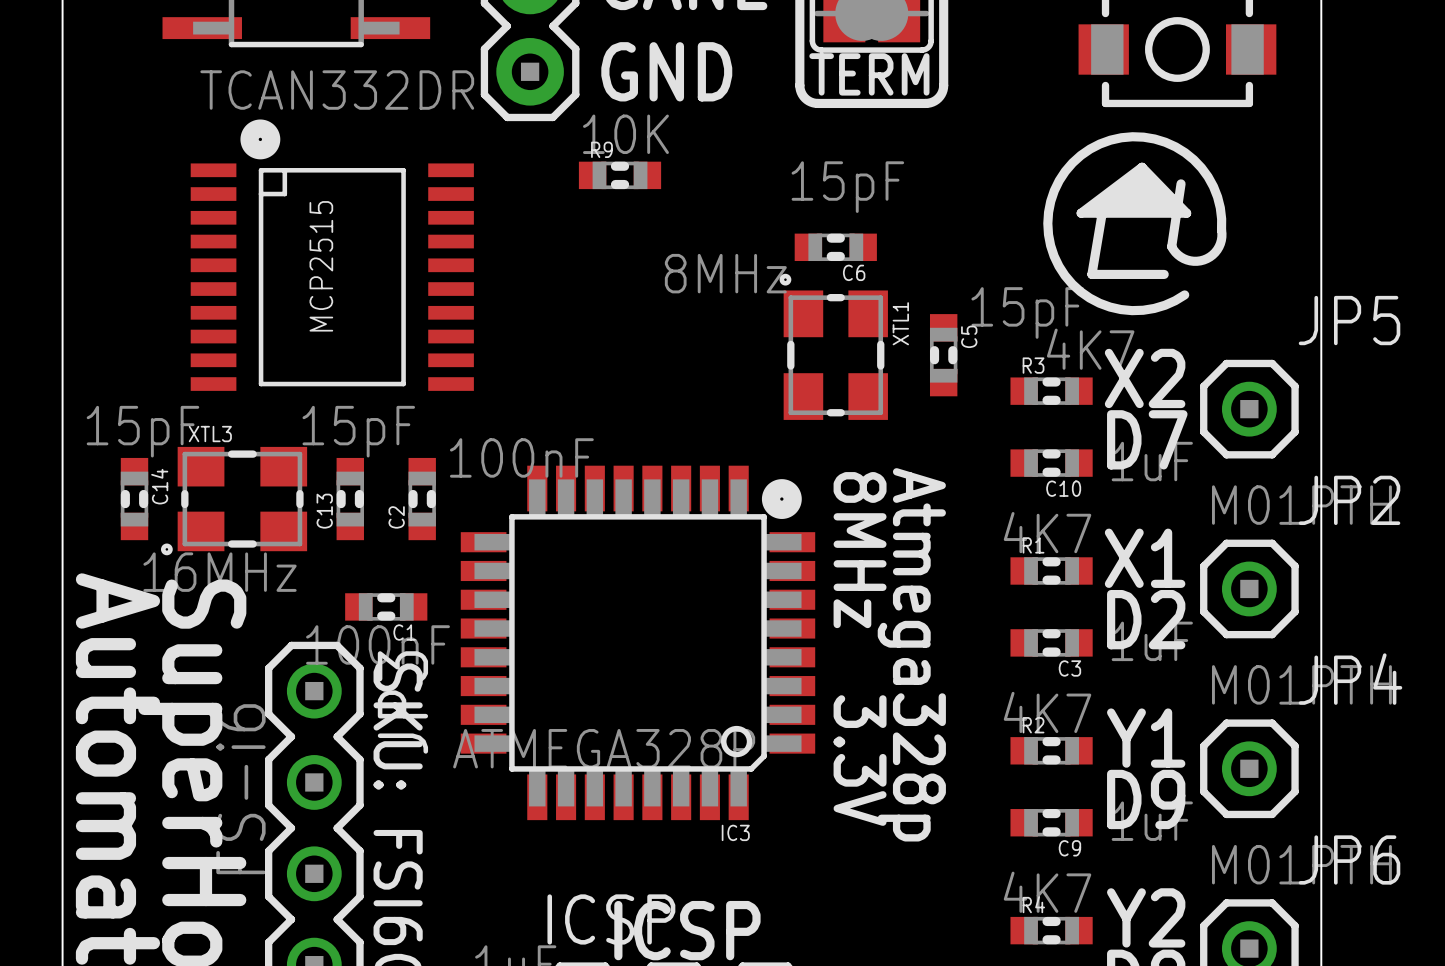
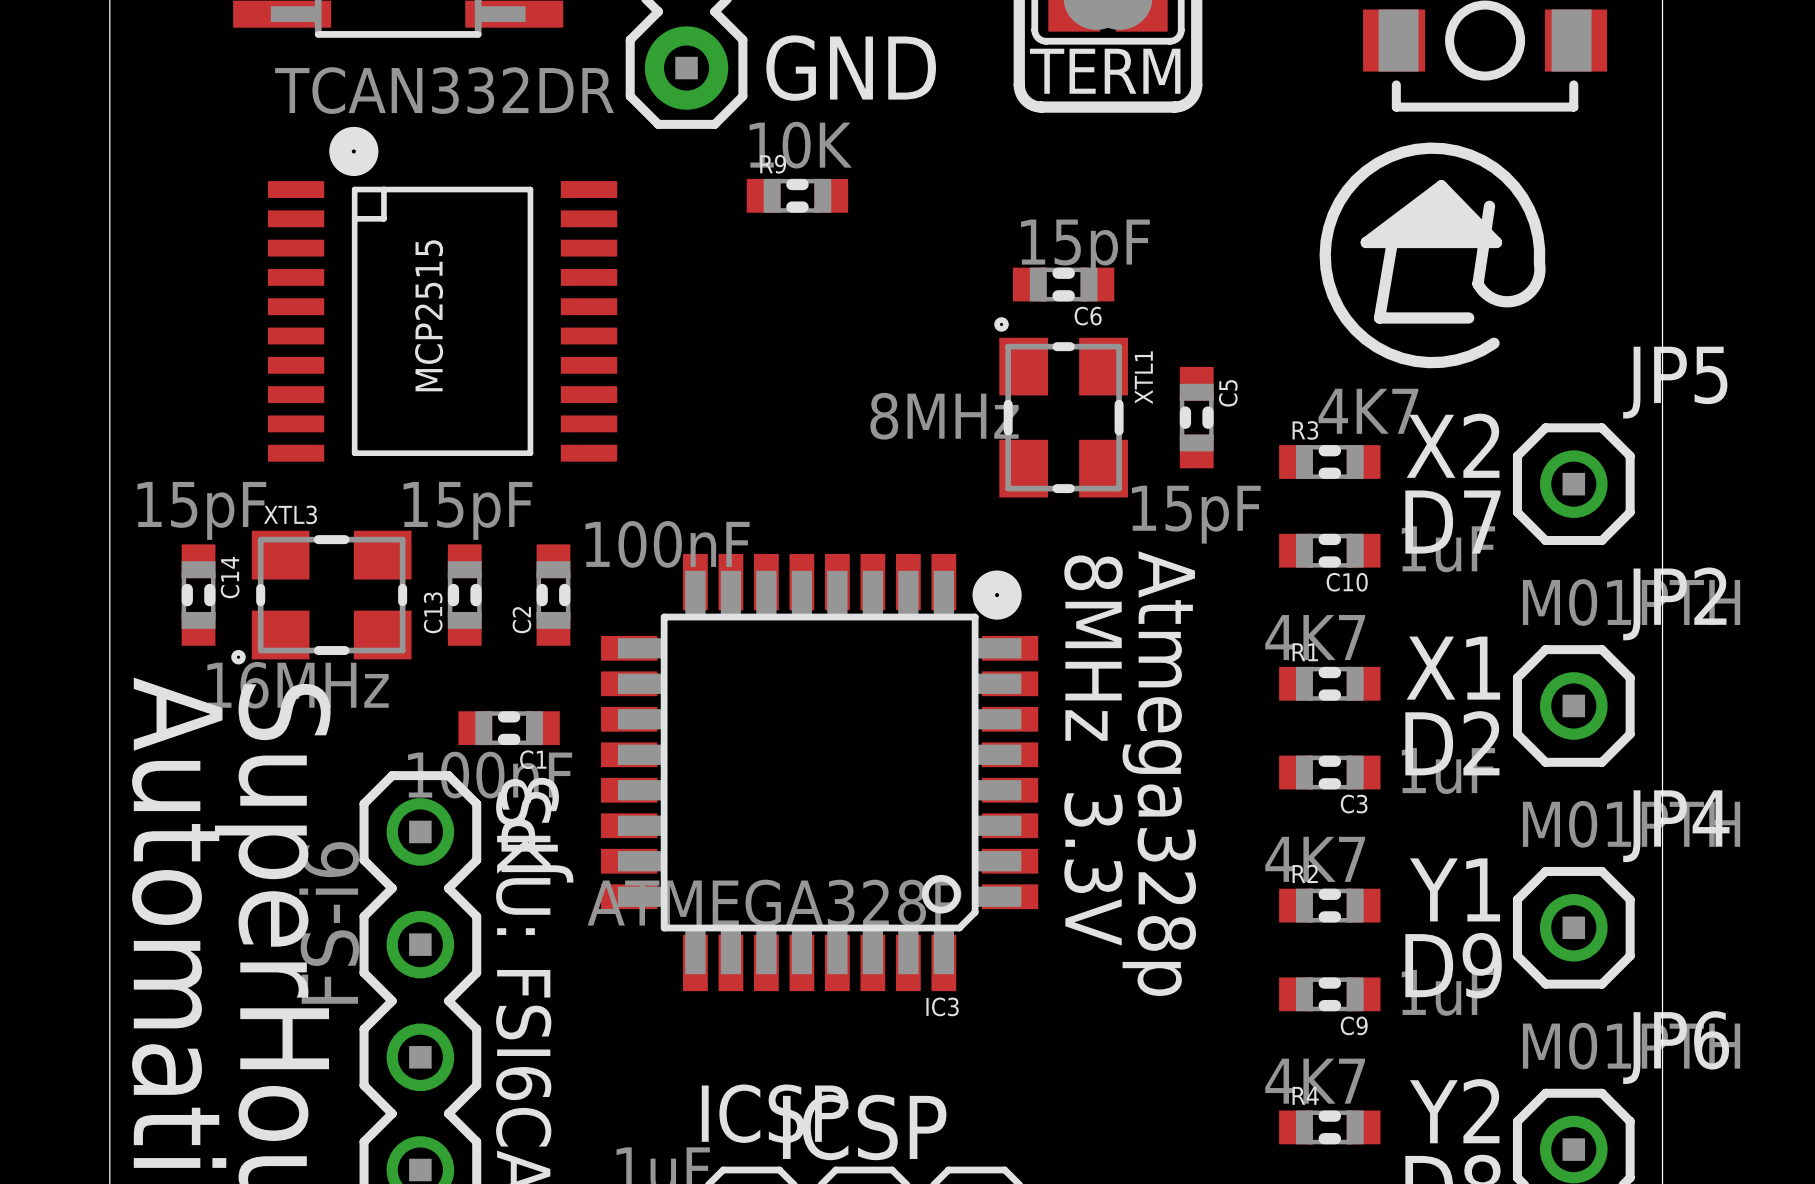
C6 value position: 15pF (847, 187) -> 15pF (1085, 248)
XTL1 value position: 8MHz (725, 273) -> 8MHz (944, 416)
C5 value position: 15pF (1027, 312) -> 15pF (1196, 514)

